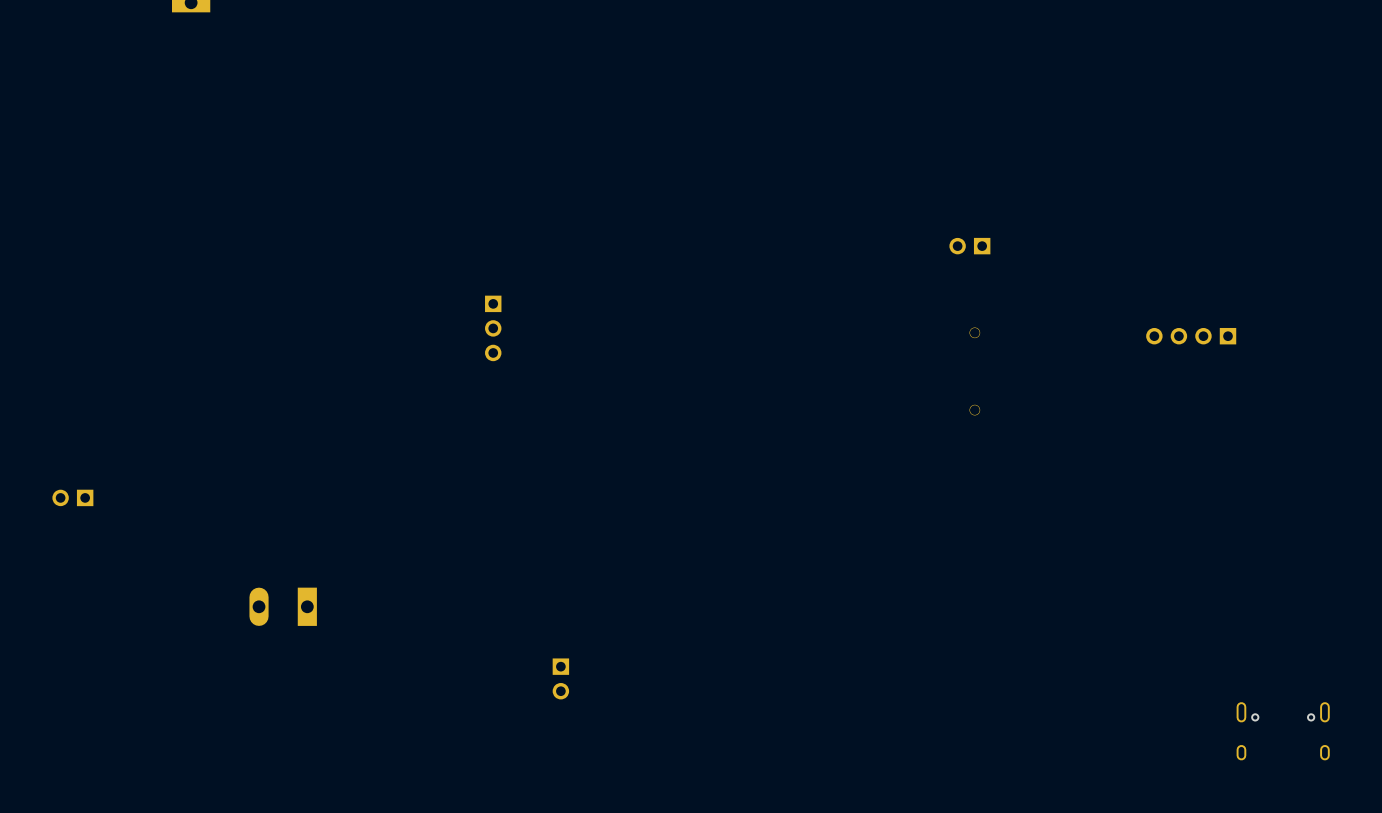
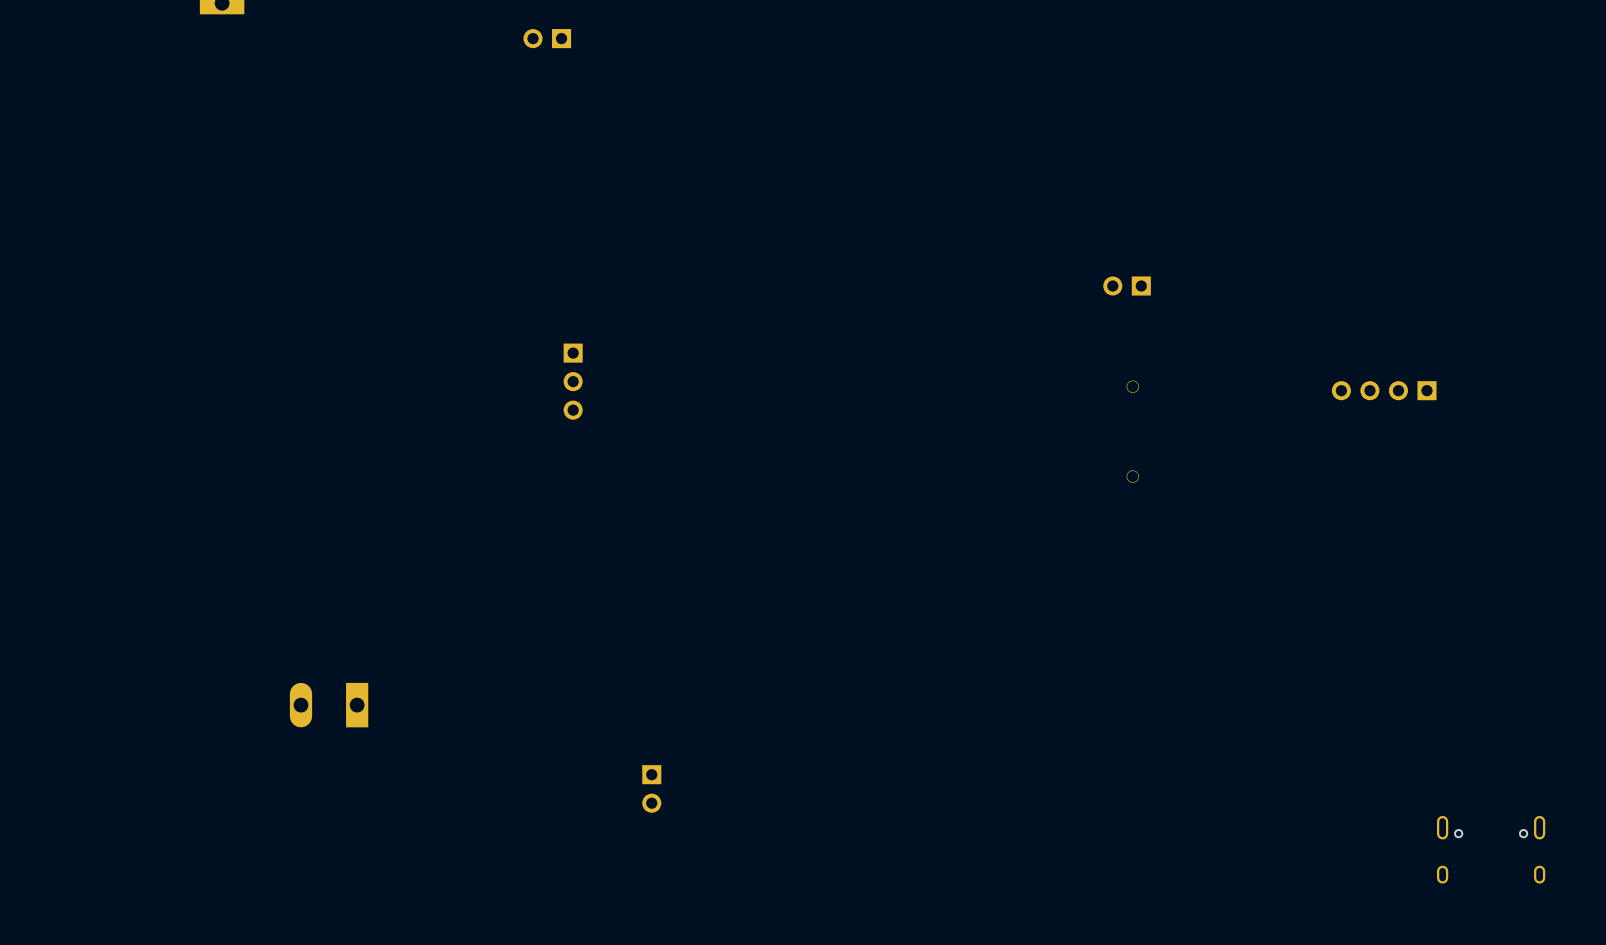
part: none -> (547, 38)
part: (72, 497) -> none

